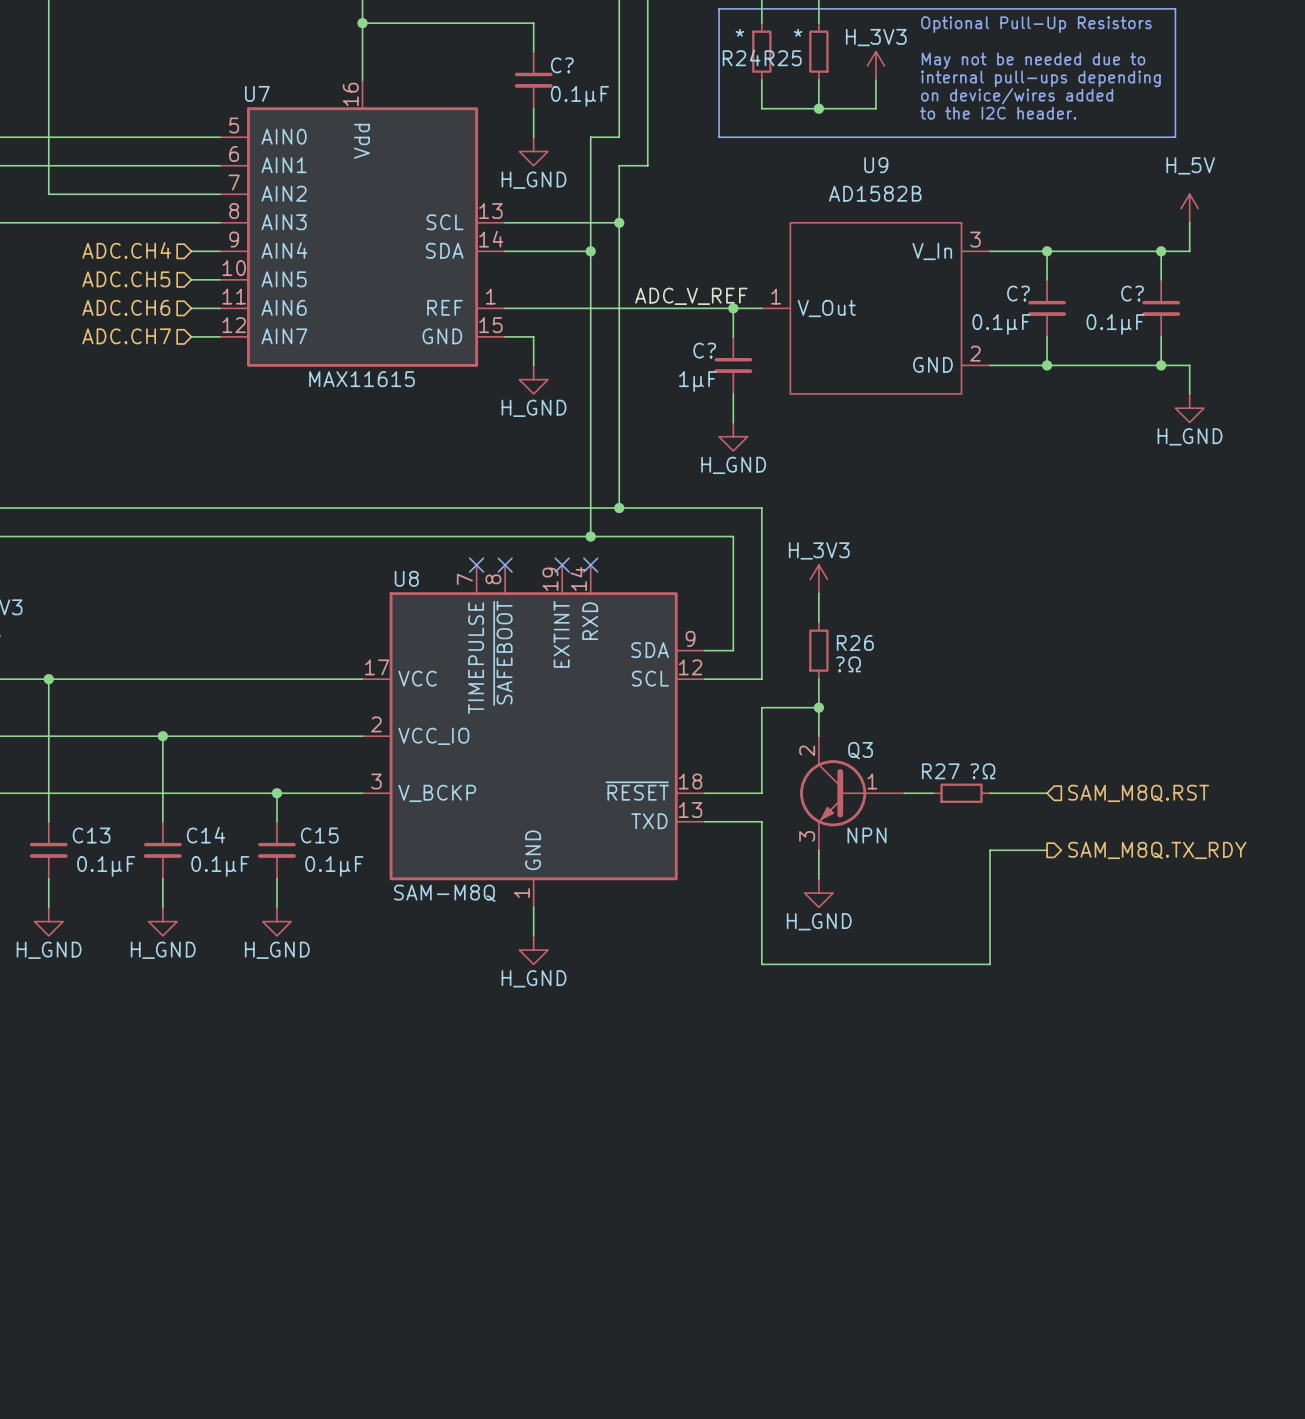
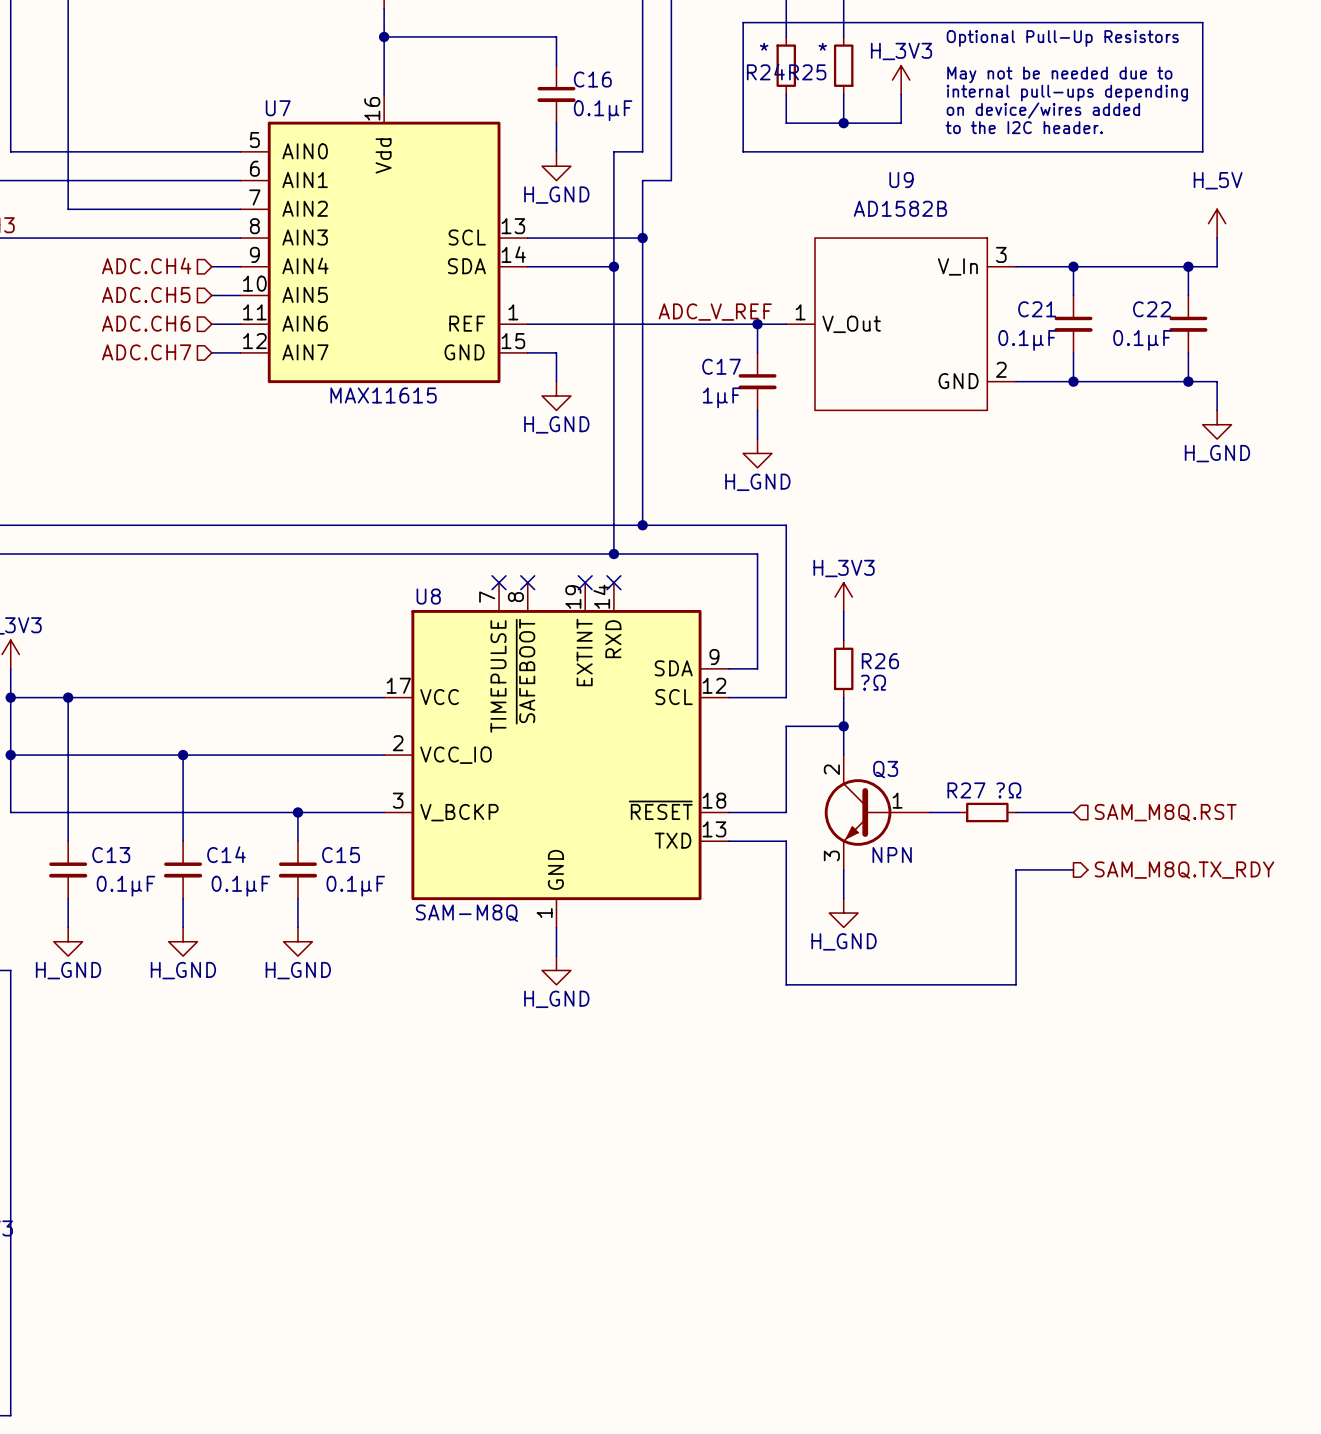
C? name: C? (562, 65) -> C16 (592, 79)
C? name: C? (1018, 293) -> C21 (1037, 309)
C? name: C? (1132, 293) -> C22 (1152, 309)
C? name: C? (704, 350) -> C17 (721, 366)

